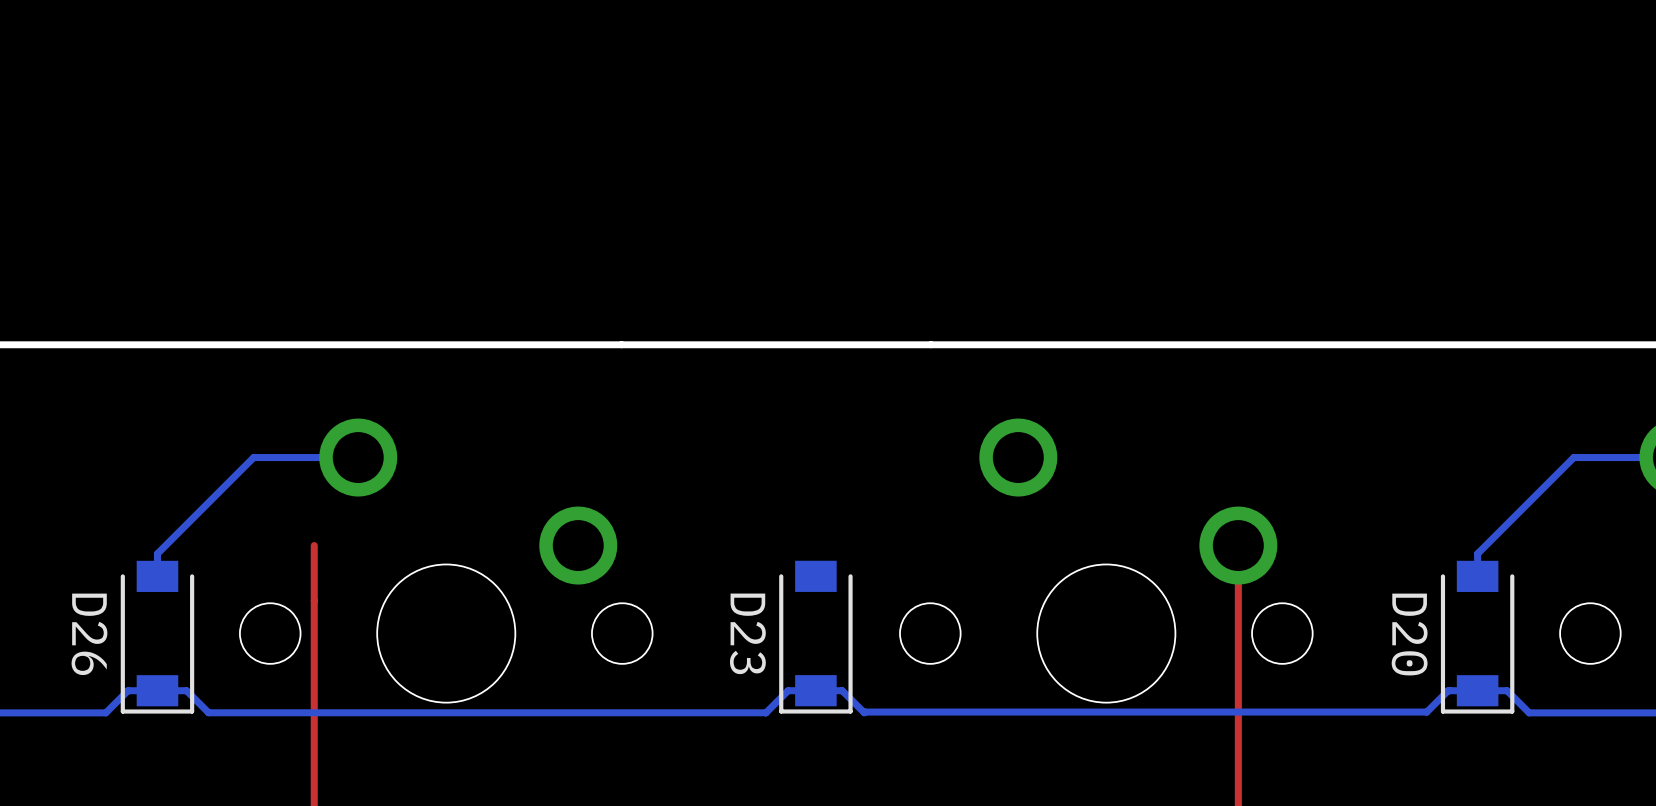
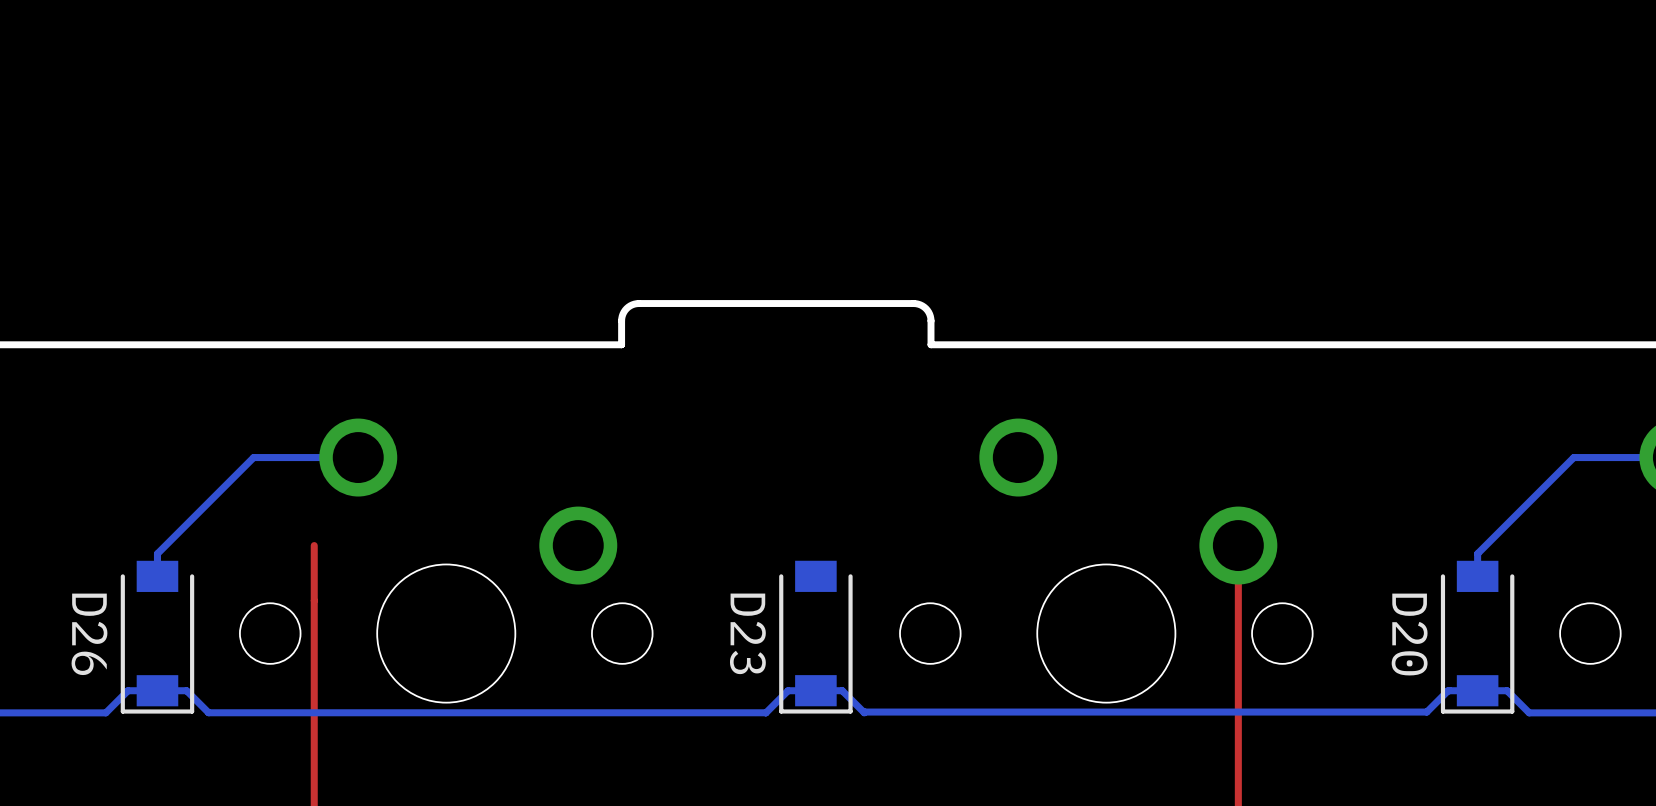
board edge: (931, 344) (621, 344) -> (931, 344) (929, 314) (922, 305) (913, 303) (636, 303) (628, 307) (622, 314) (621, 344)

